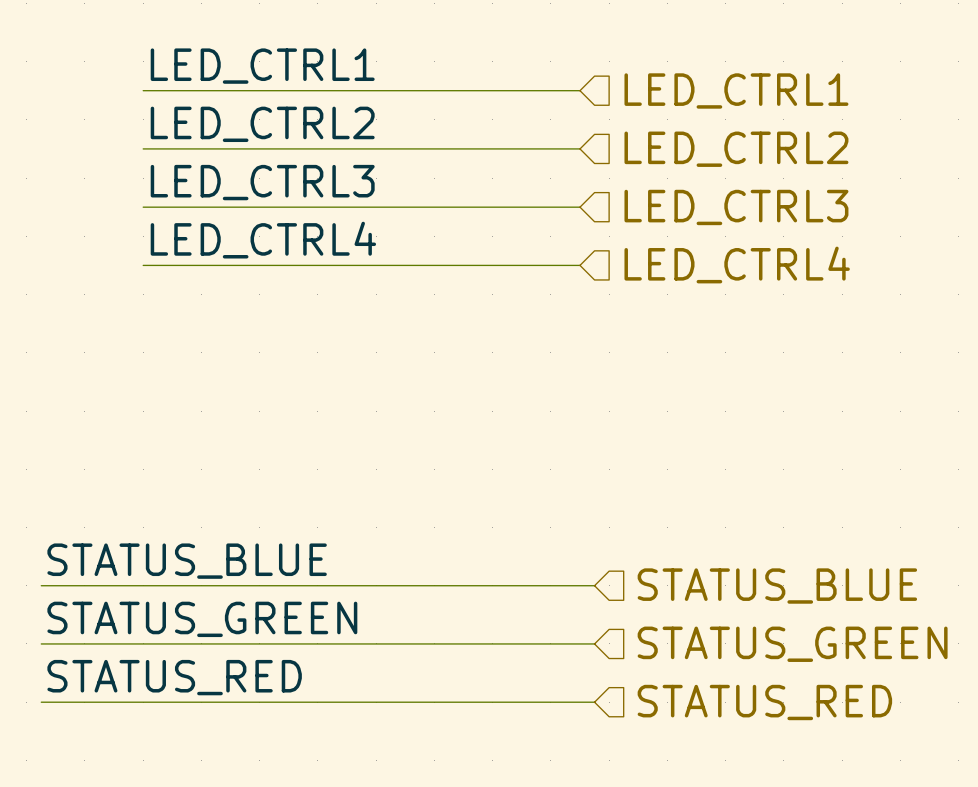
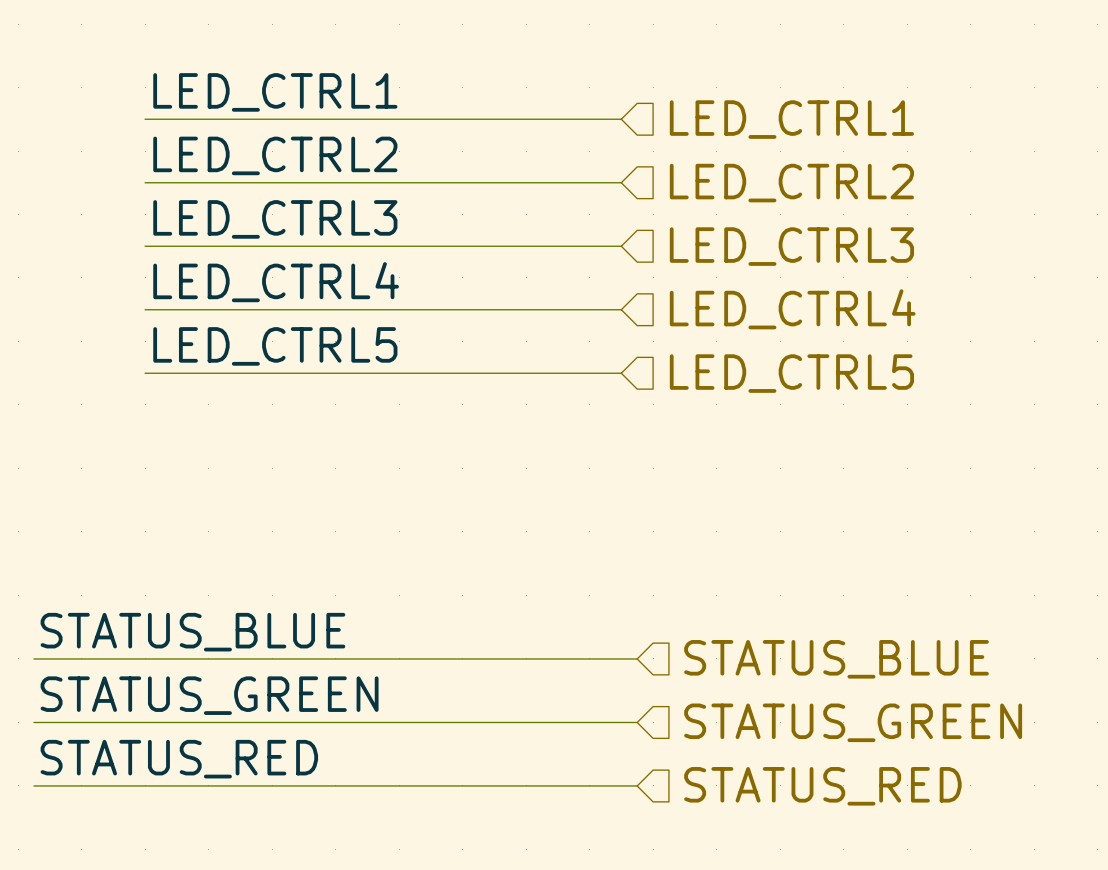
label: none -> LED_CTRL5 (275, 346)
wire: none -> (145, 373) (621, 373)
hierarchical label: none -> LED_CTRL5 (791, 373)

